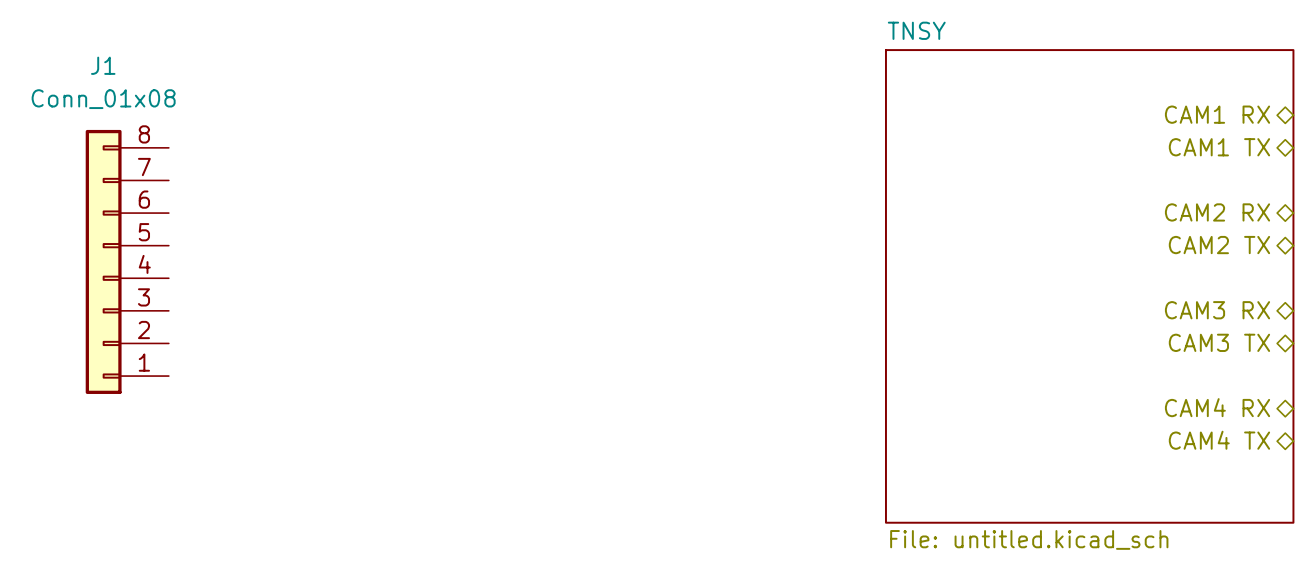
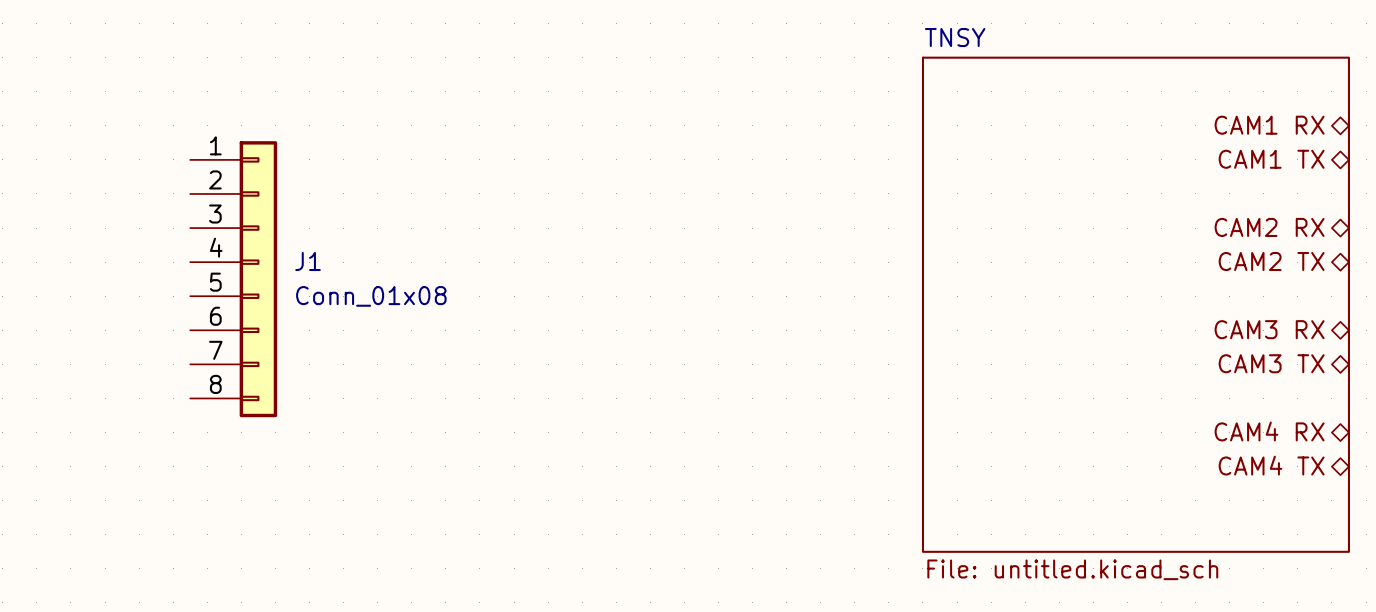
J1 name position: J1 (103, 65) -> J1 (308, 261)
J1 value position: Conn_01x08 (103, 99) -> Conn_01x08 (371, 296)
J1 rotation: 0° (103, 261) -> 180° (258, 279)

